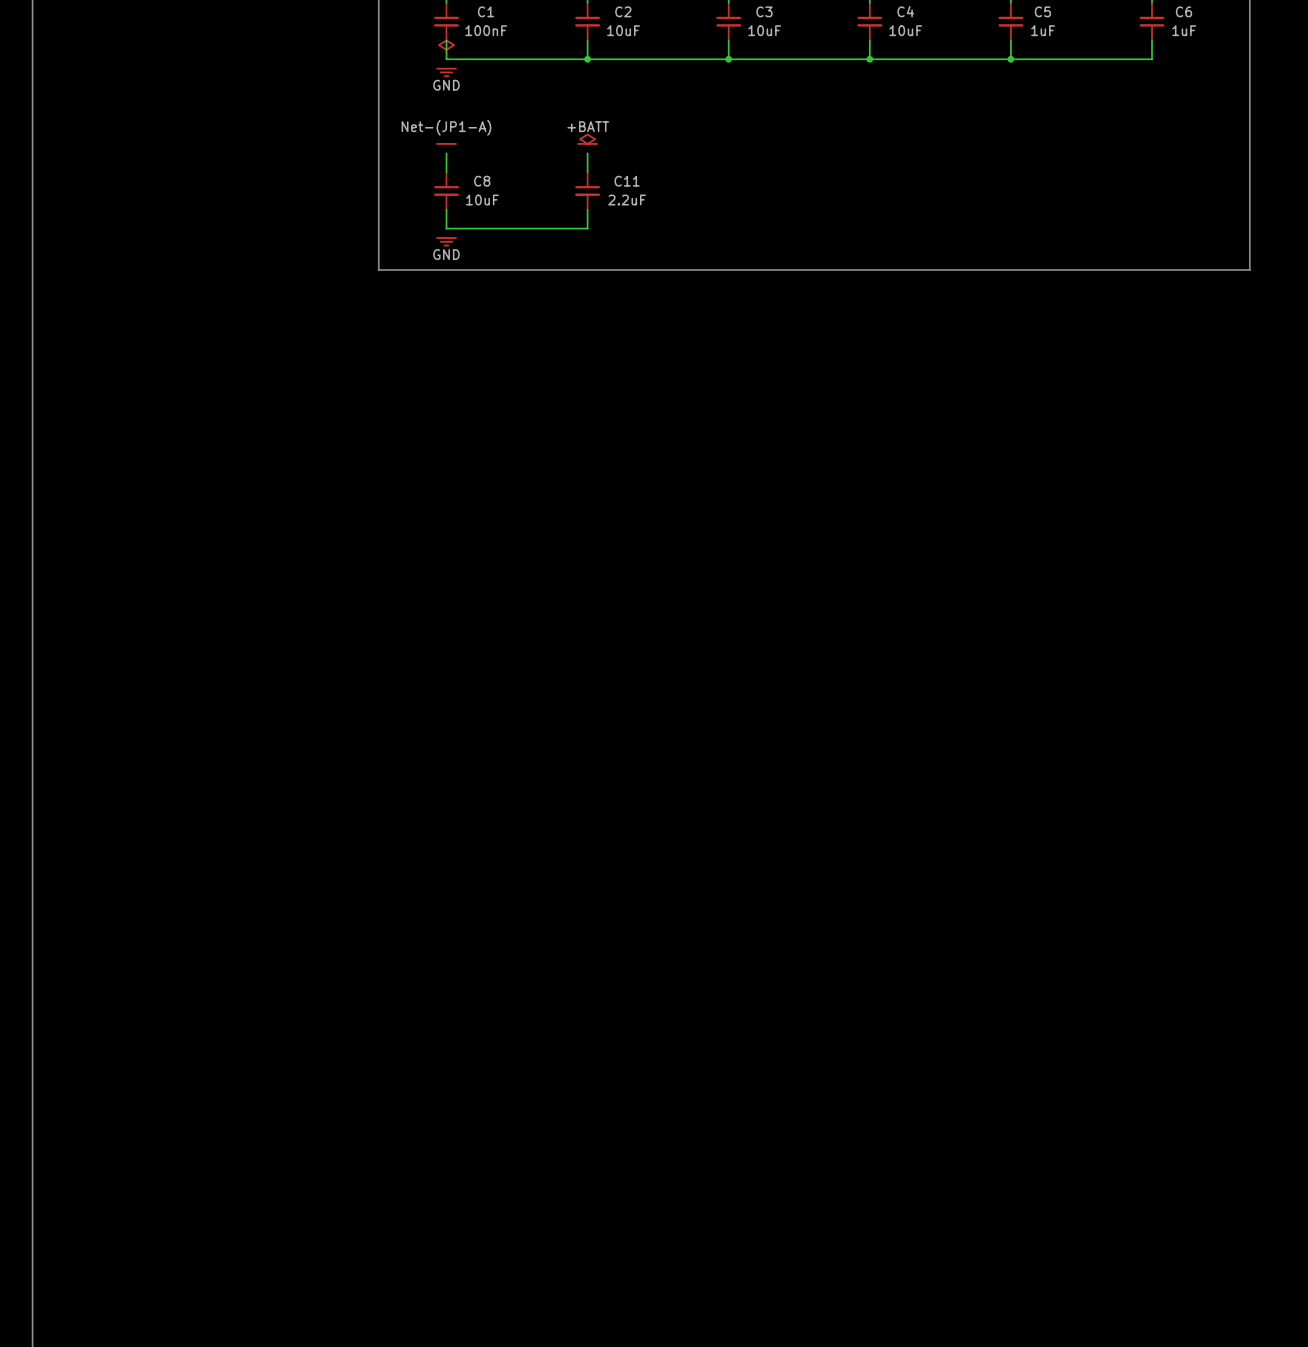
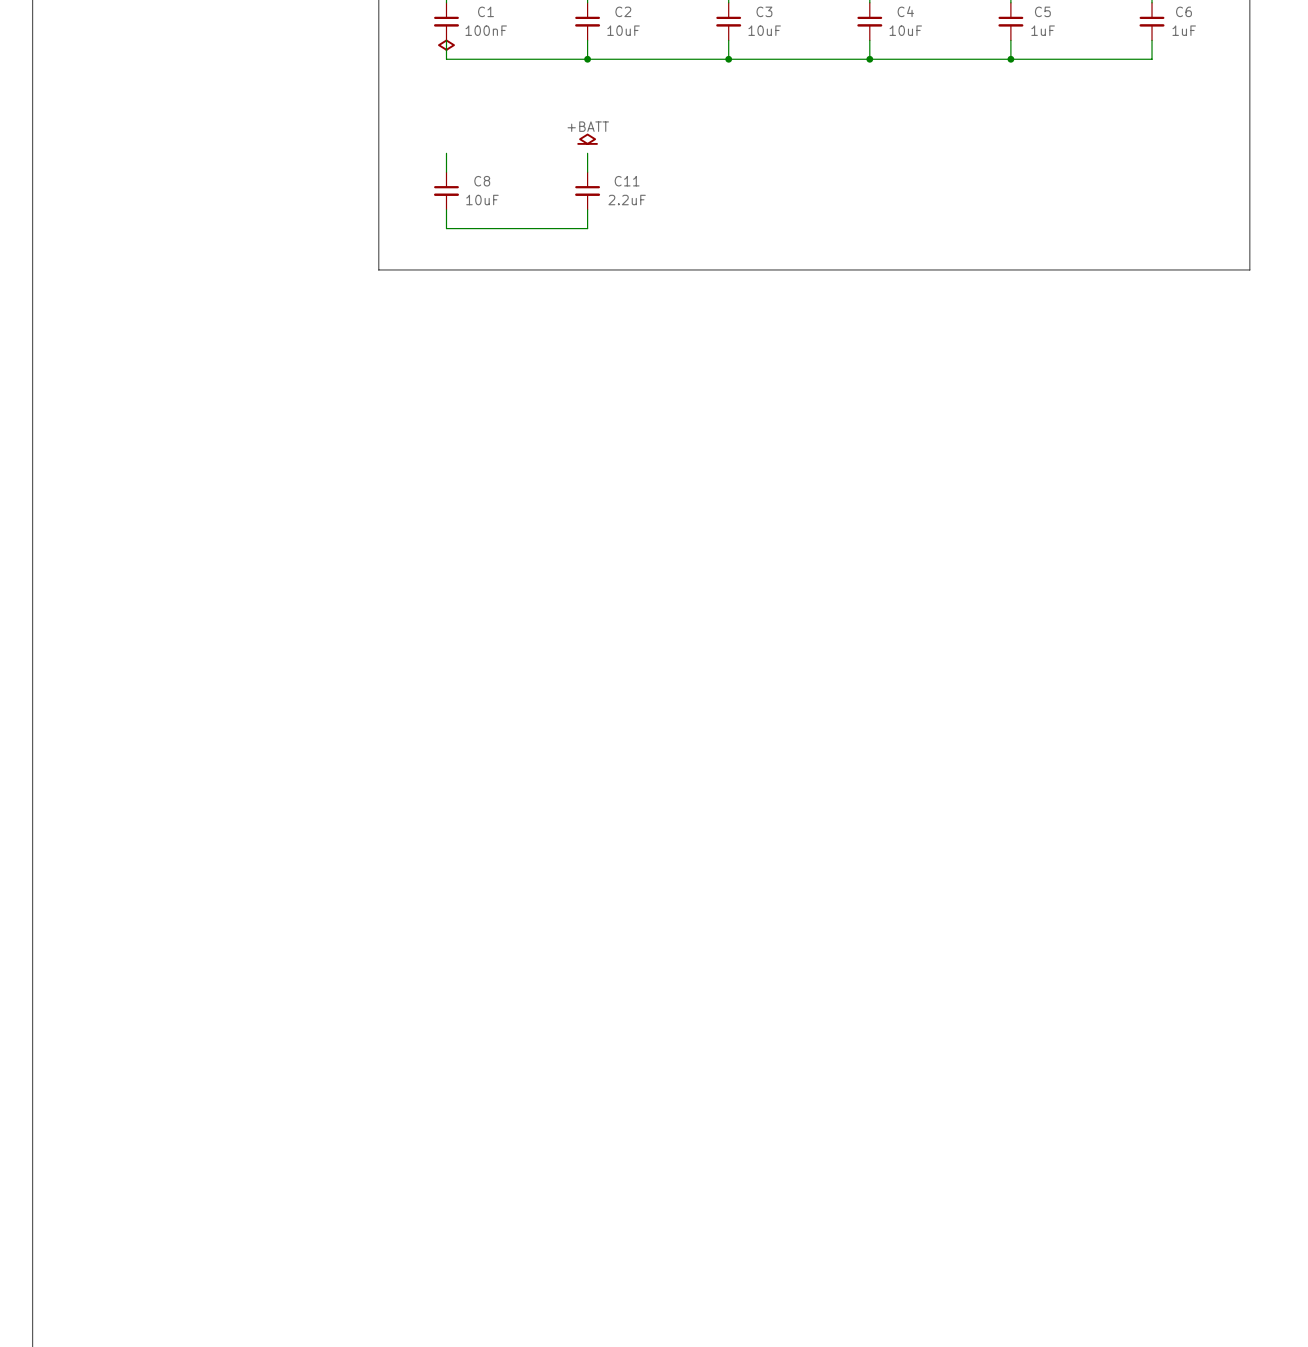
power symbol: GND (446, 72) -> none
power symbol: Net-(JP1-A) (446, 143) -> none
power symbol: GND (446, 241) -> none

